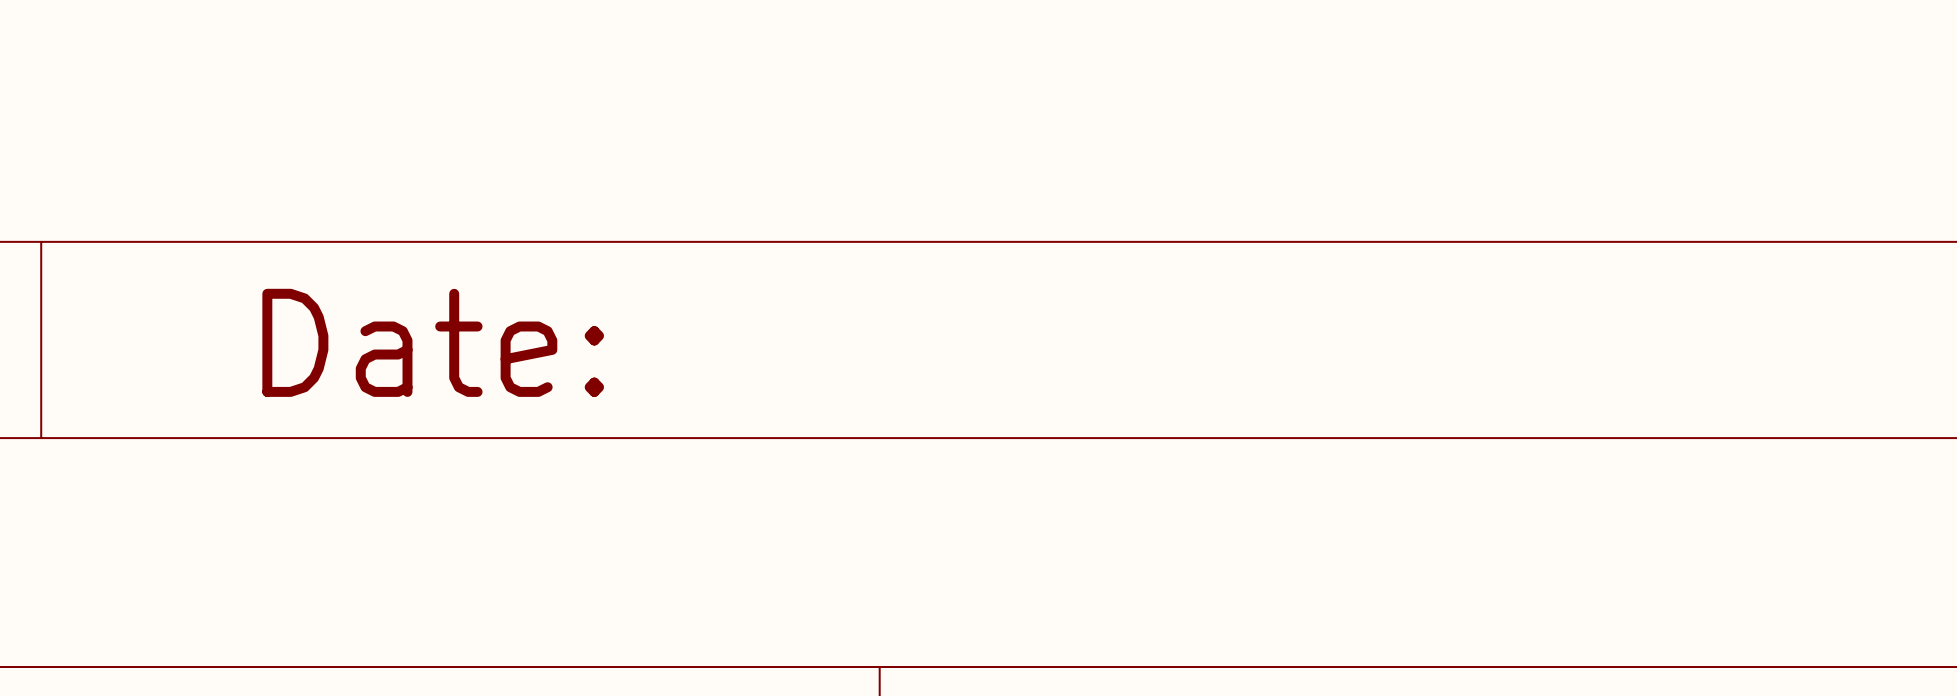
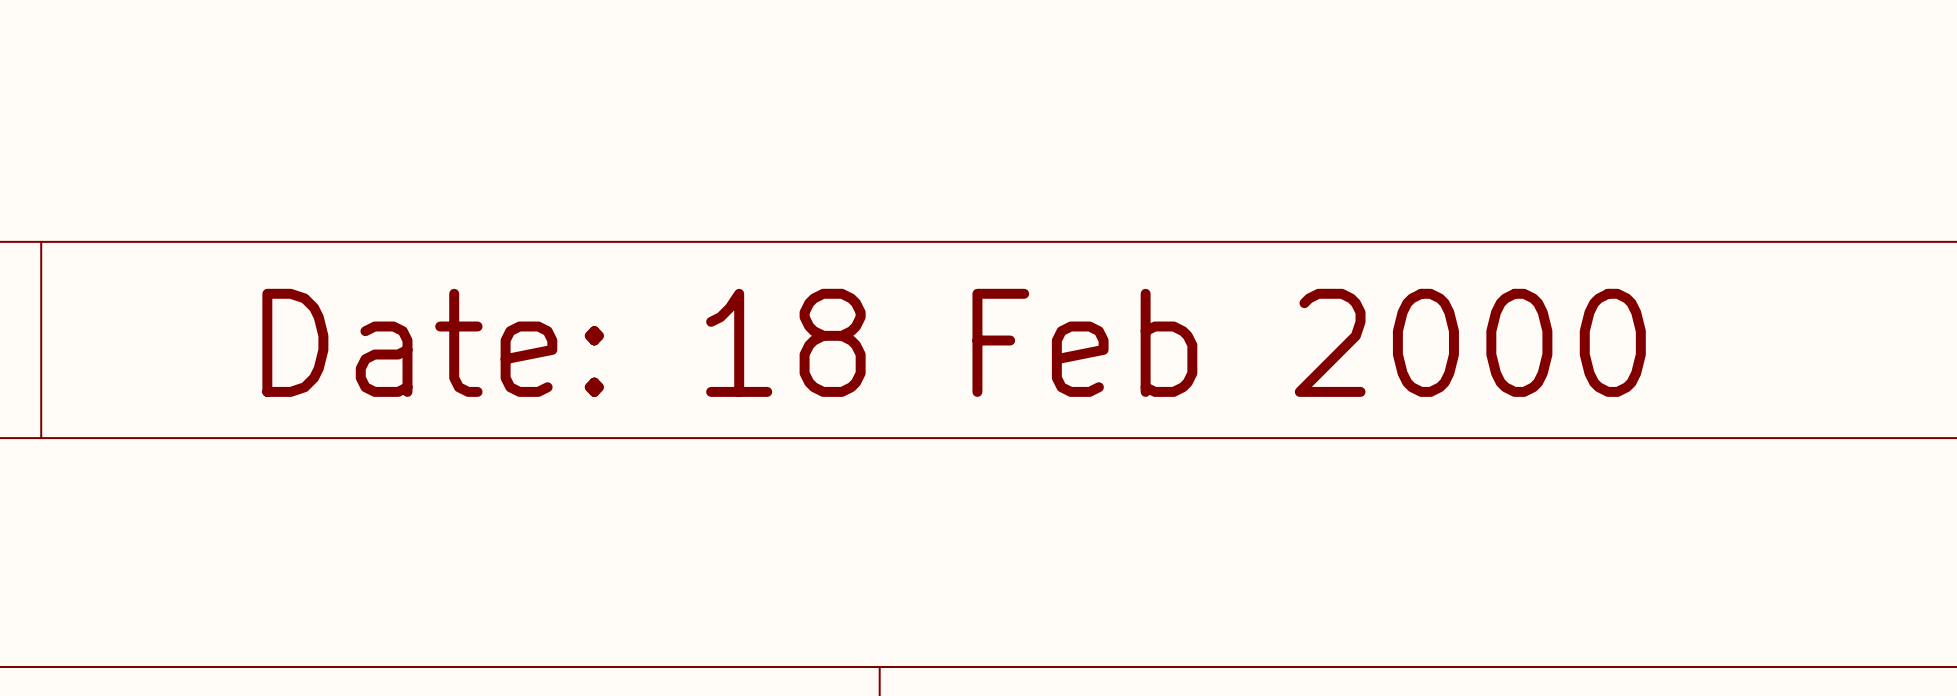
title block: Date: (433, 342) -> Date: 18 Feb 2000 (954, 342)

